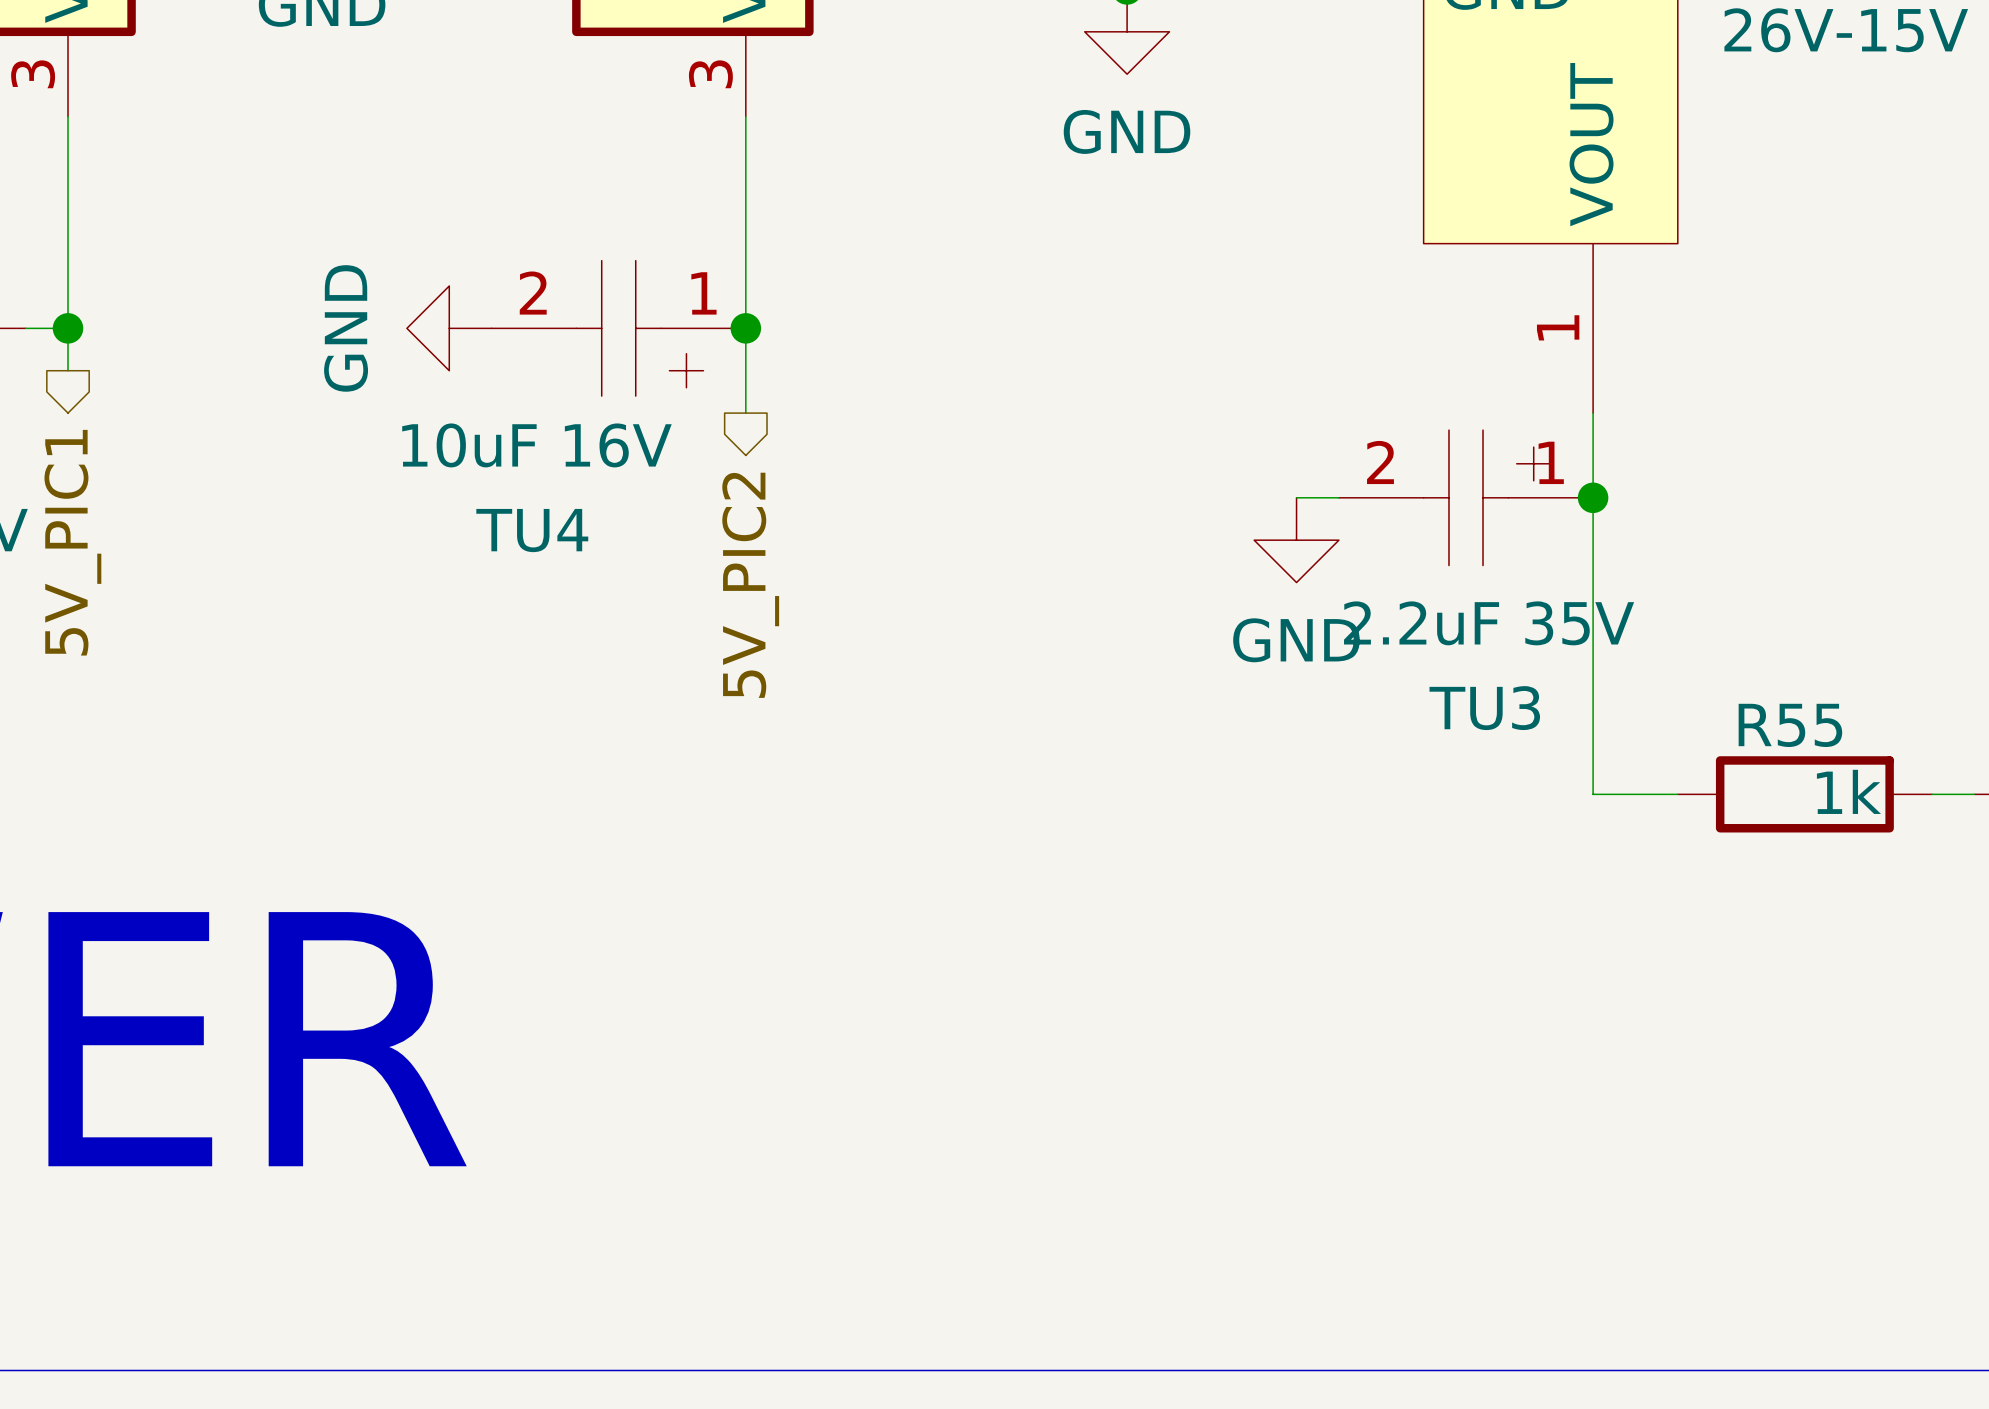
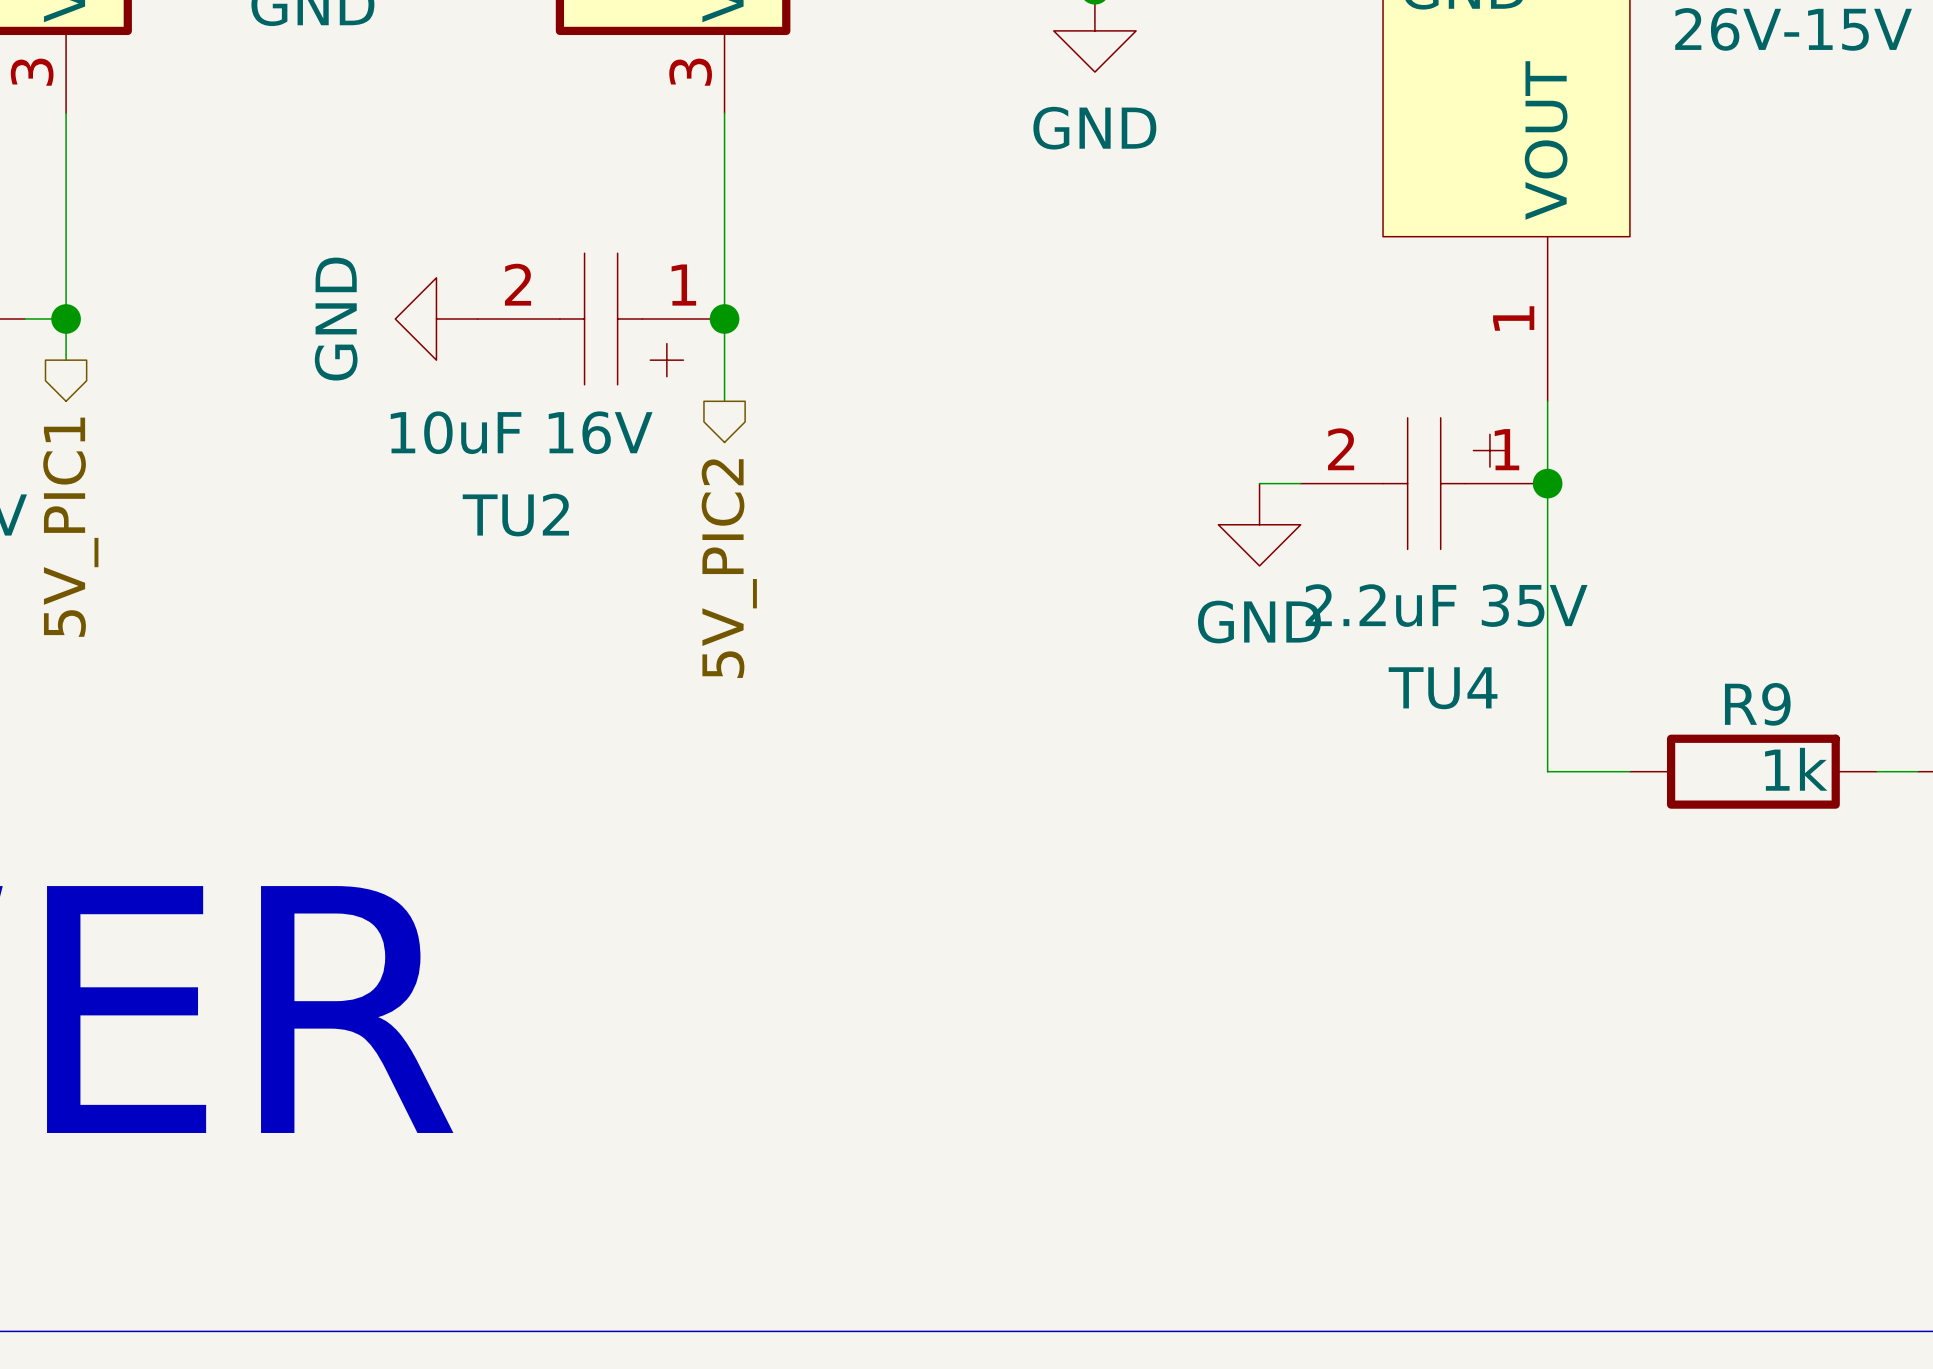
TU4 name: TU4 (532, 530) -> TU2 (515, 515)
TU3 name: TU3 (1484, 708) -> TU4 (1443, 688)
R55 name: R55 (1790, 725) -> R9 (1757, 704)

